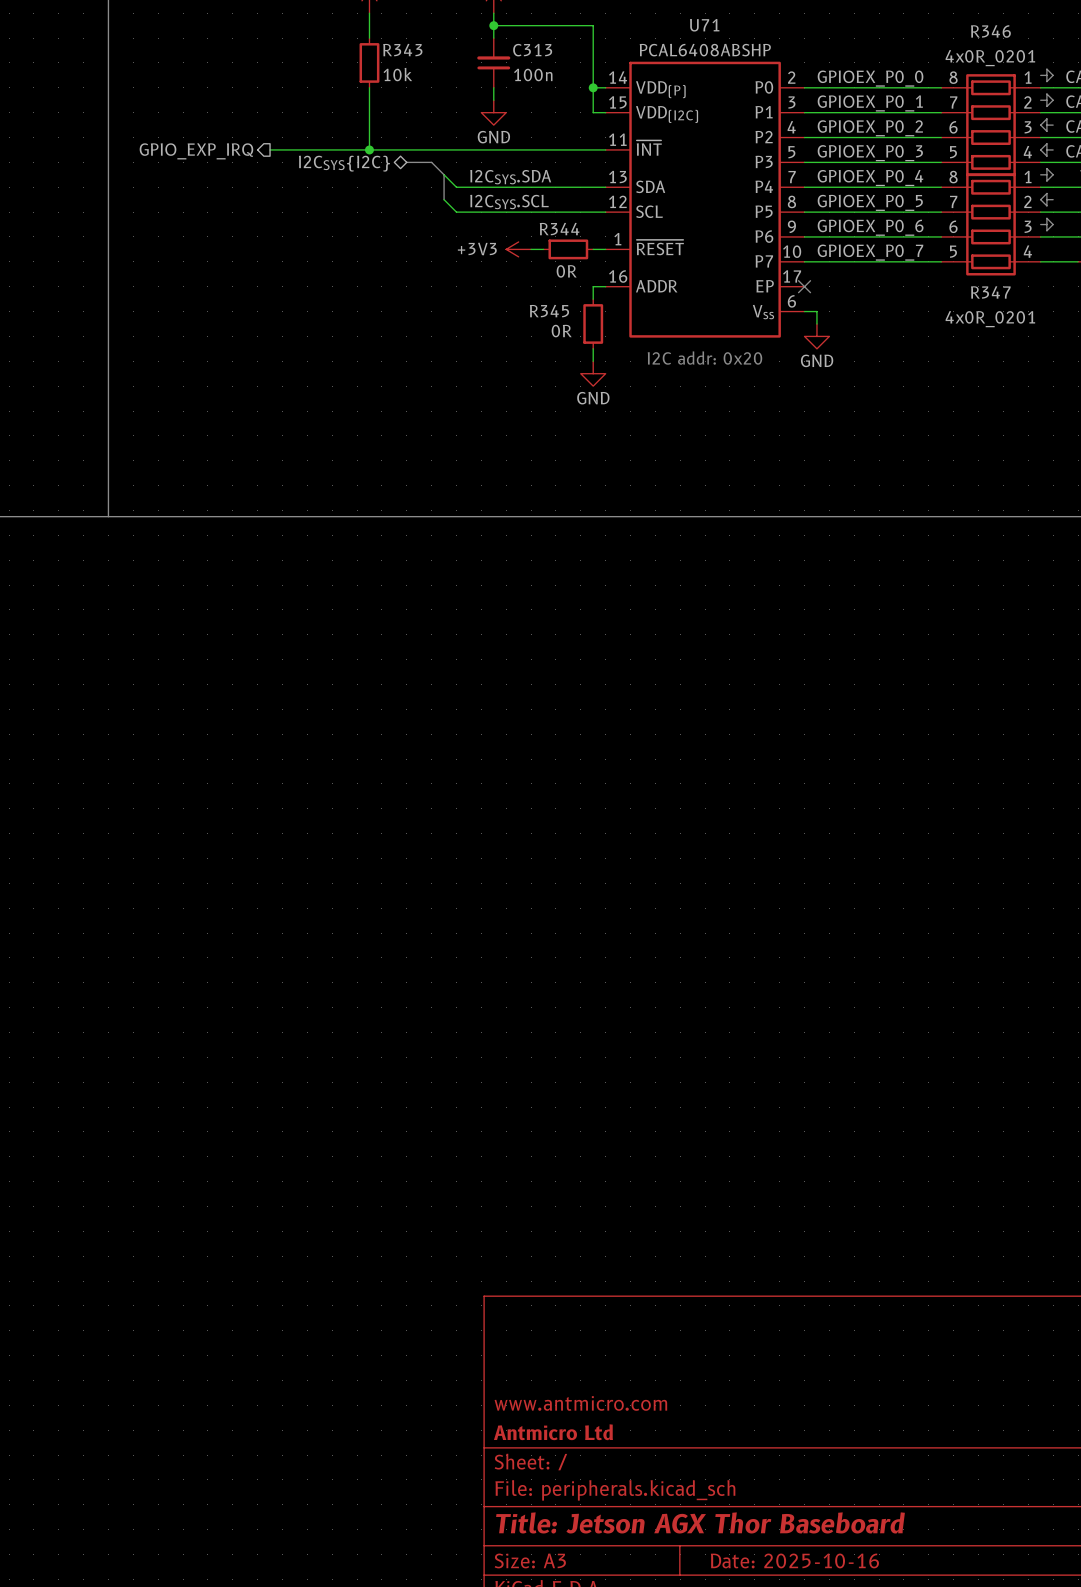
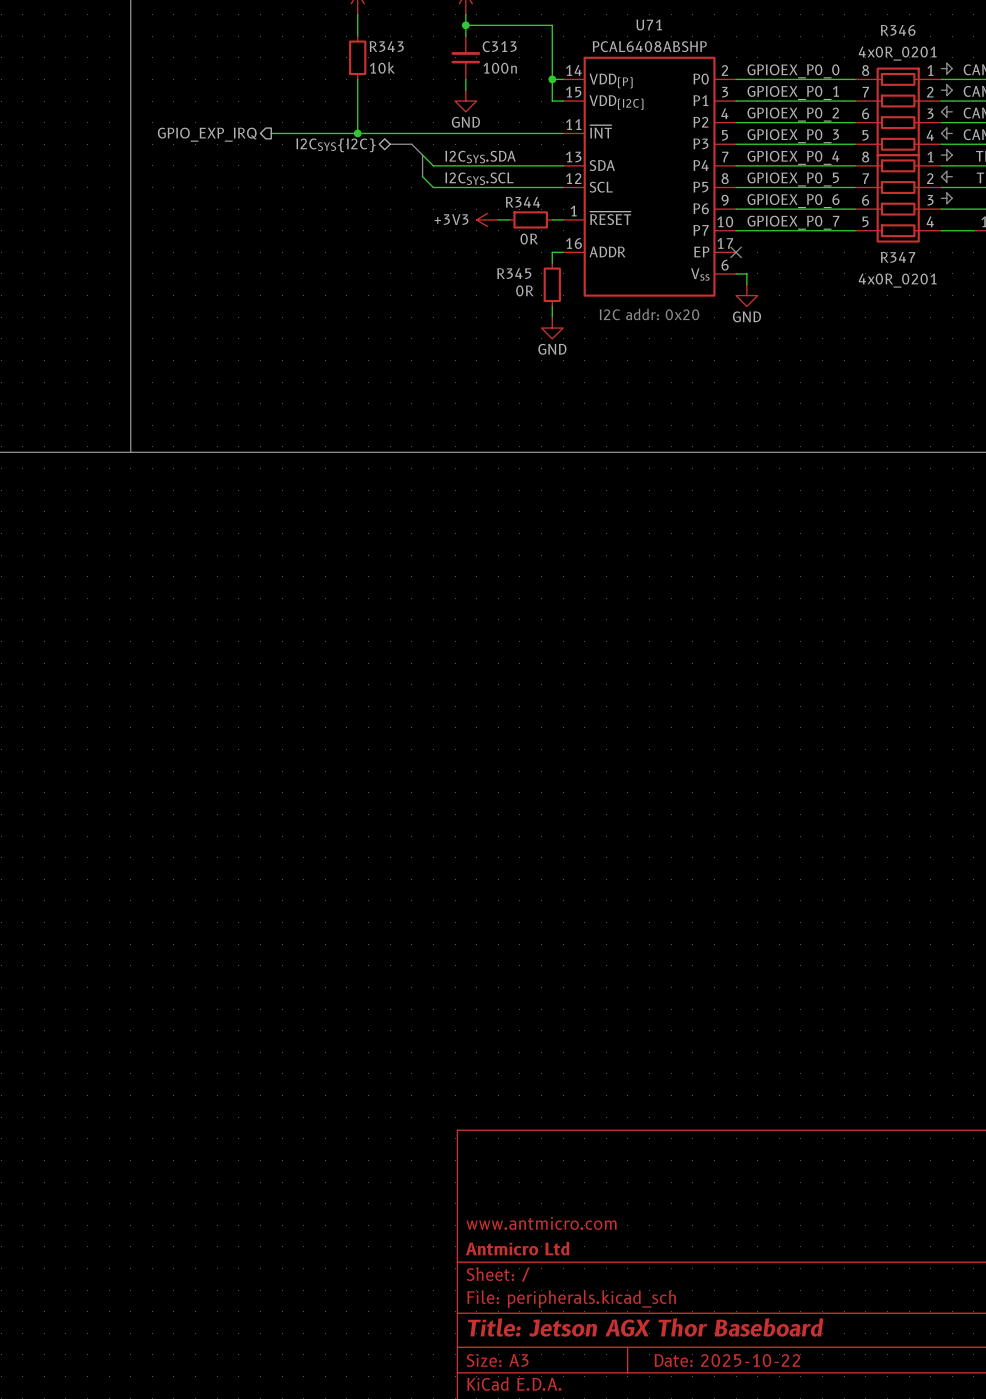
title block: Date: 2025-10-16 (794, 1560) -> Date: 2025-10-22 (727, 1360)

